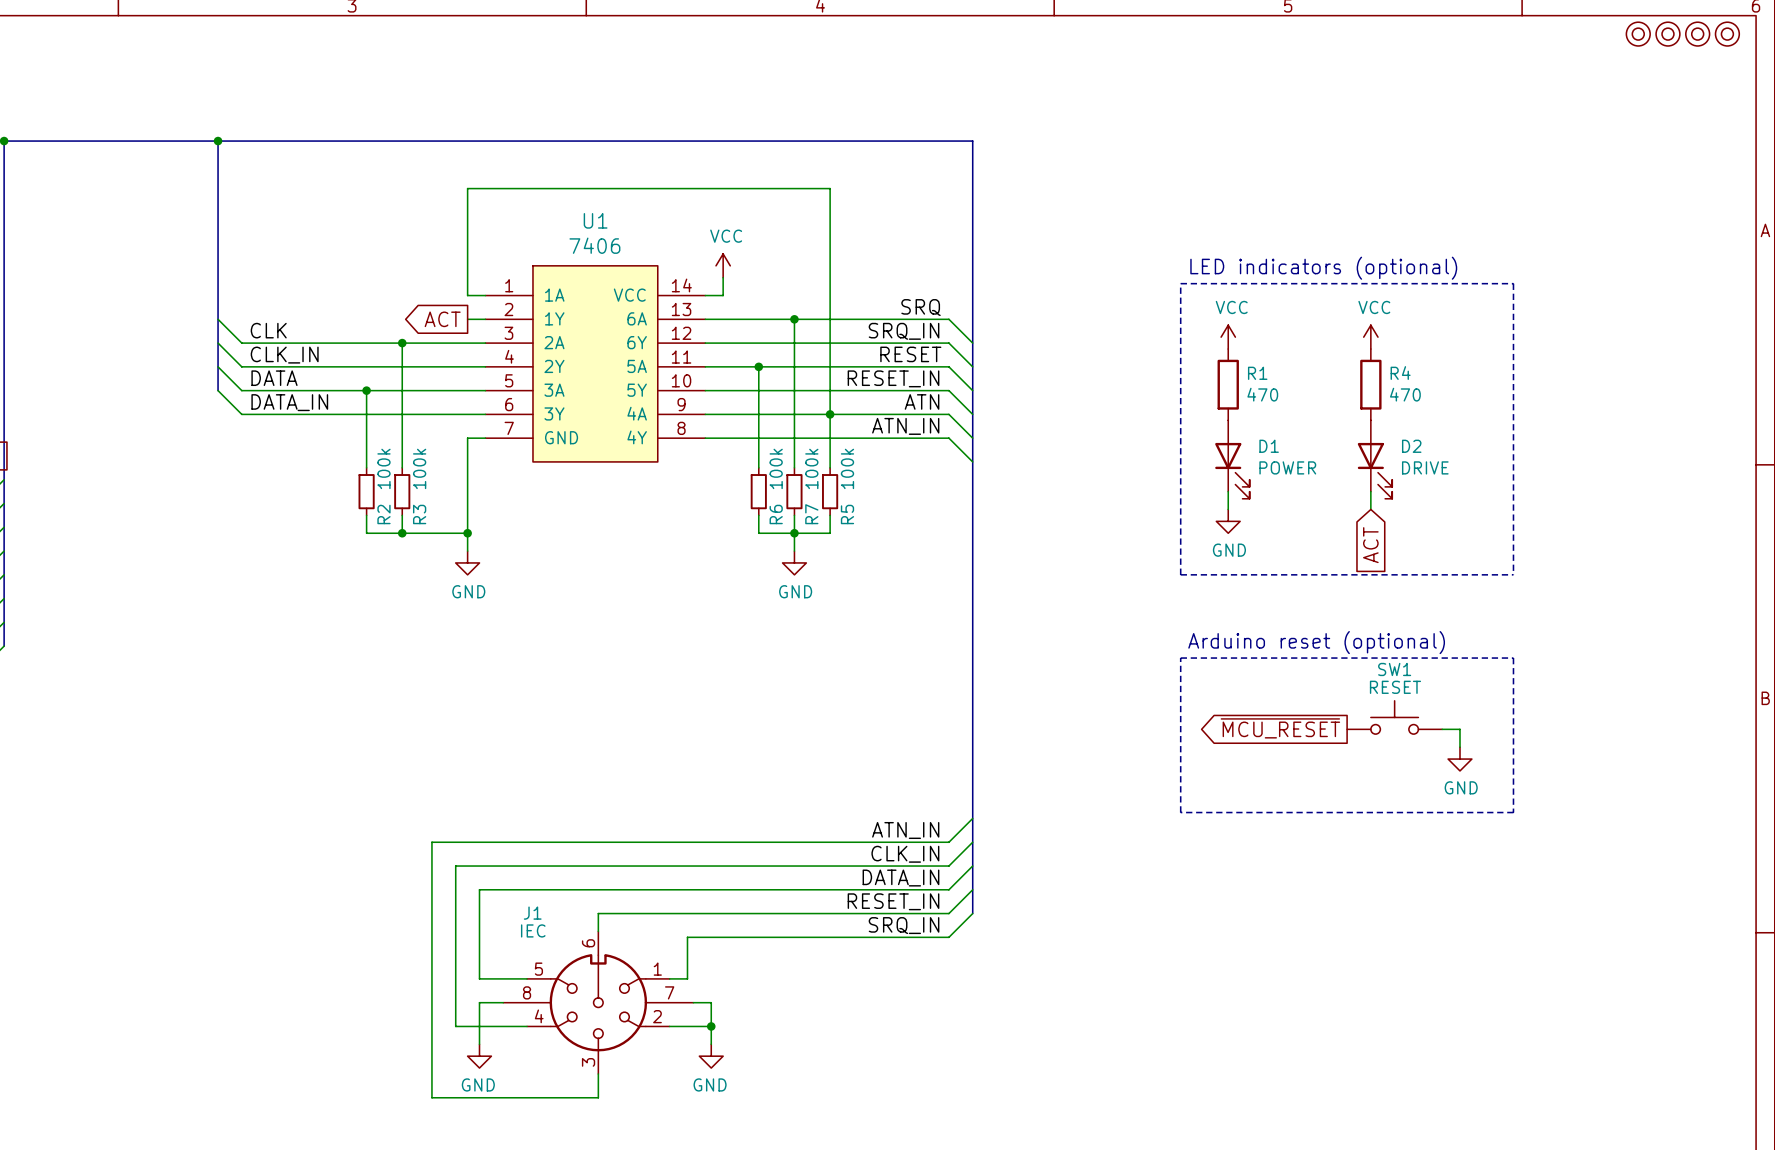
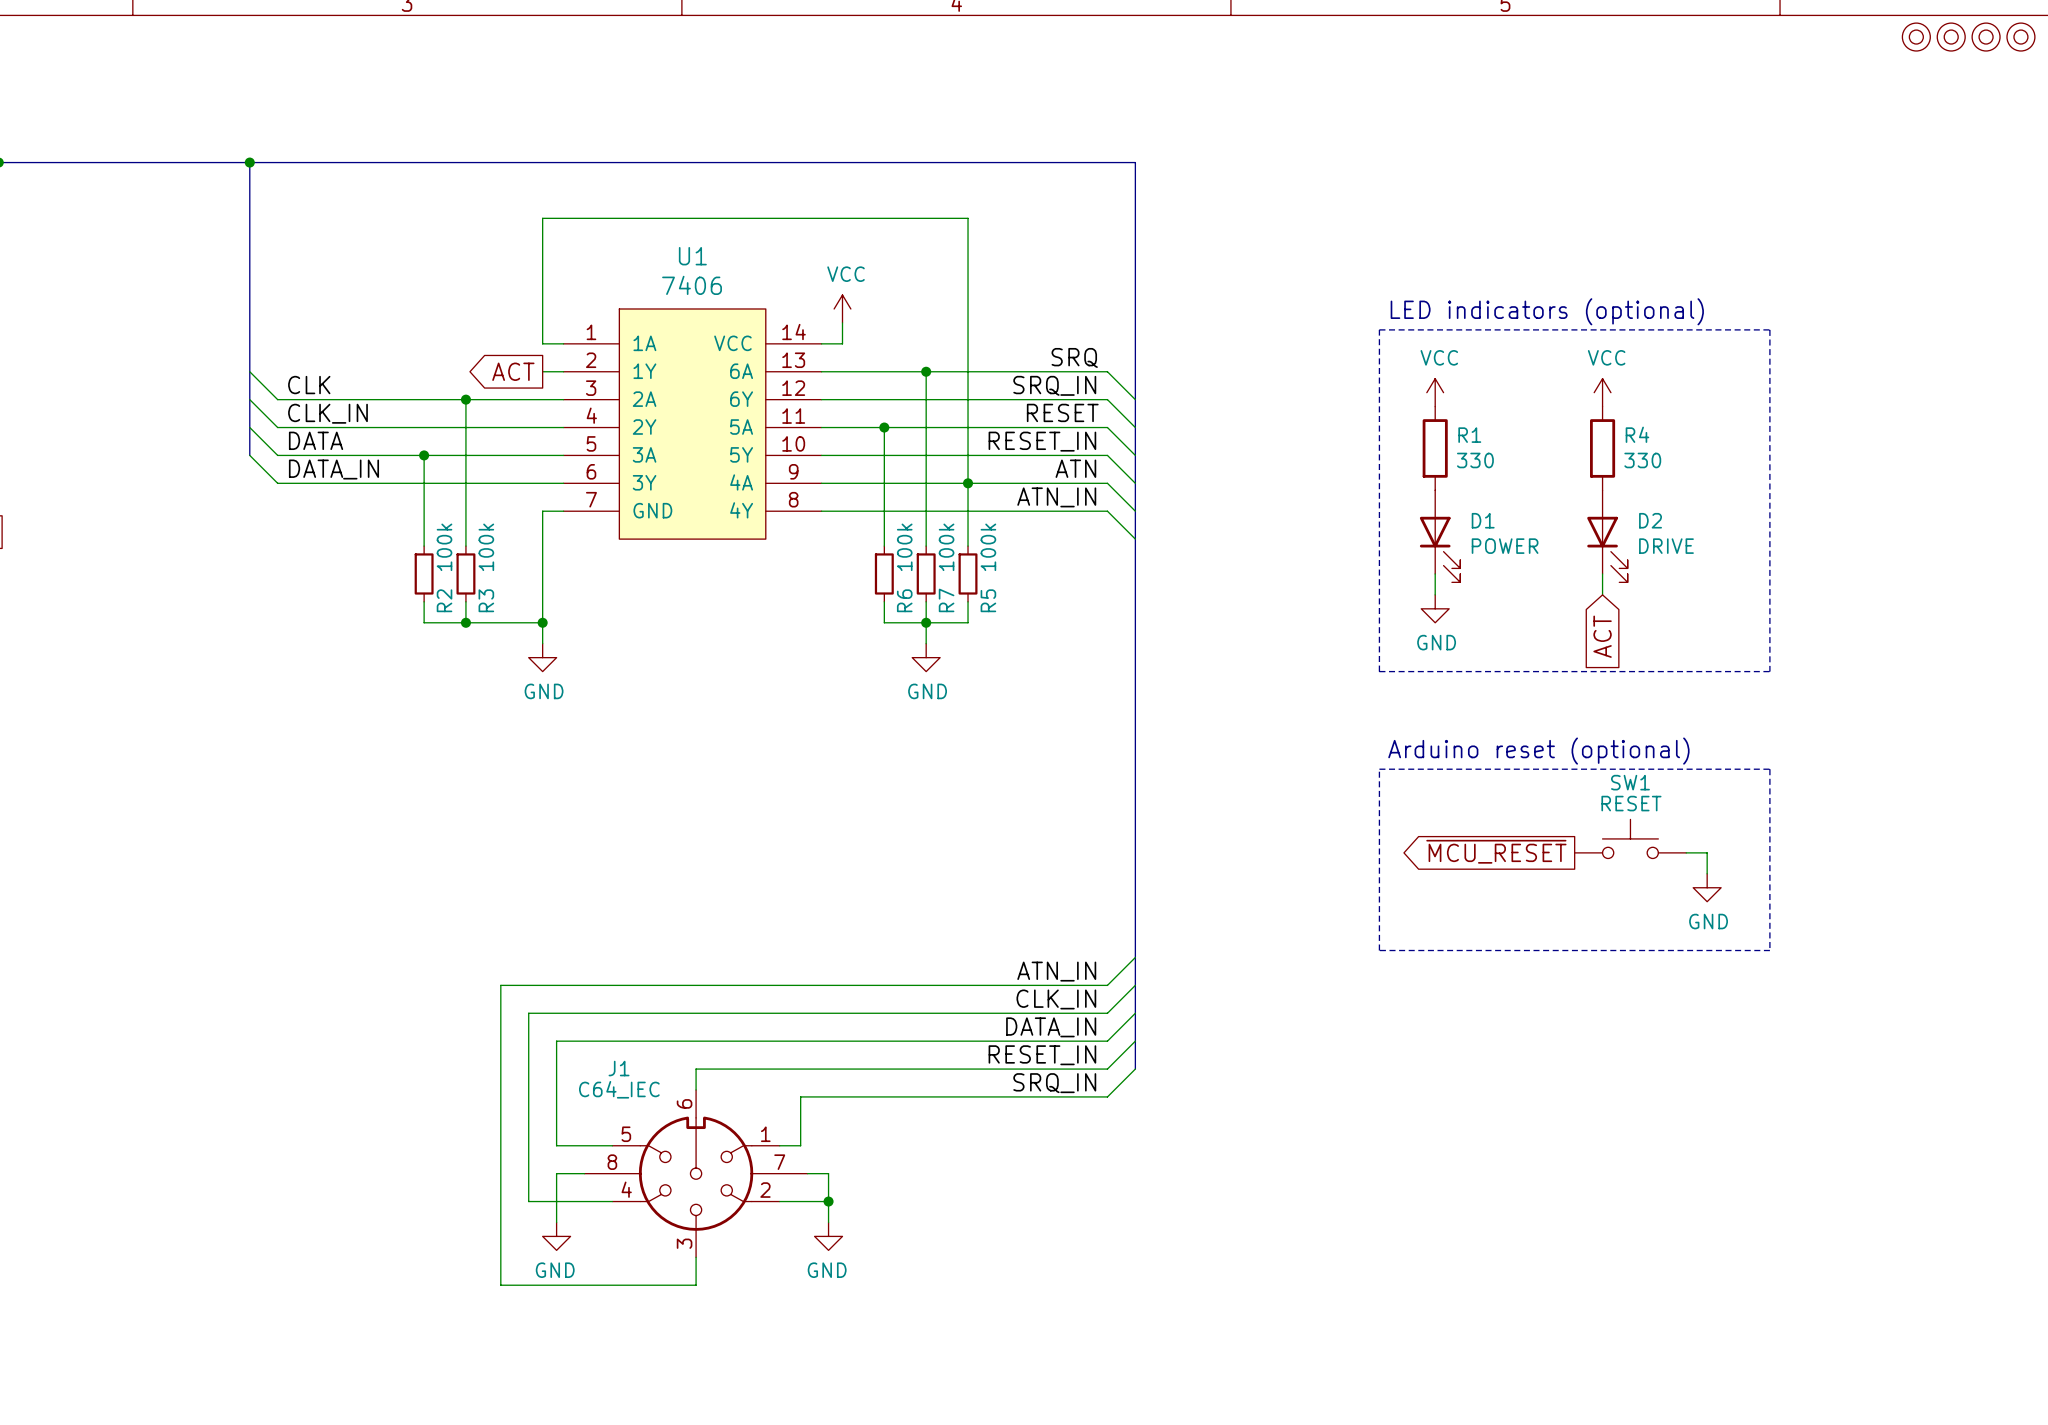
R1 value: 470 (1262, 394) -> 330 (1475, 460)
R4 value: 470 (1405, 394) -> 330 (1642, 460)
J1 value: IEC (533, 930) -> C64_IEC (619, 1089)

